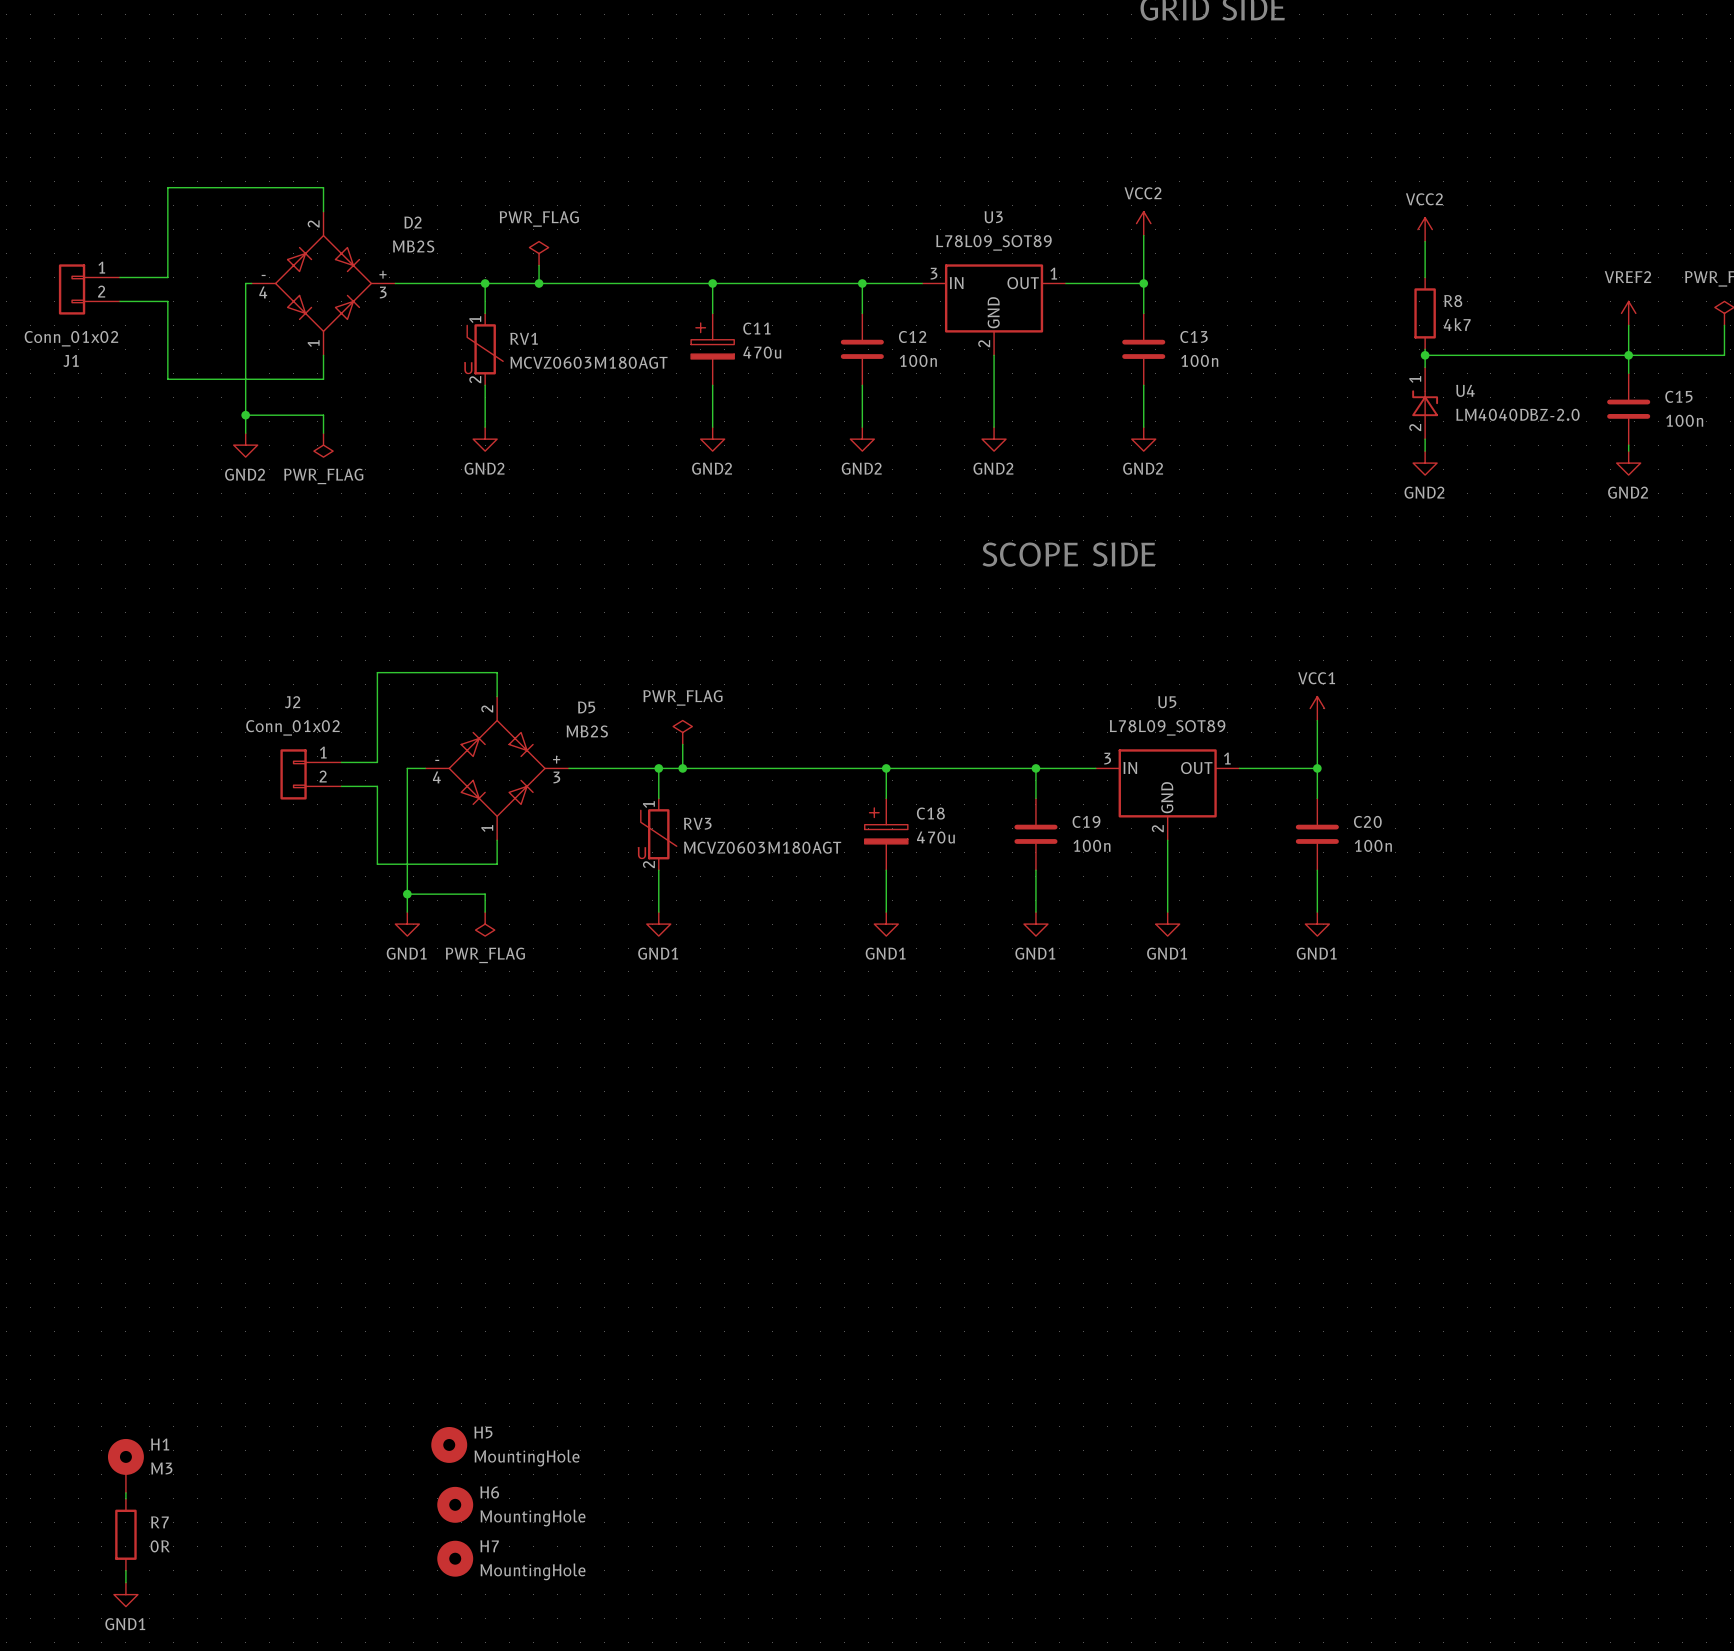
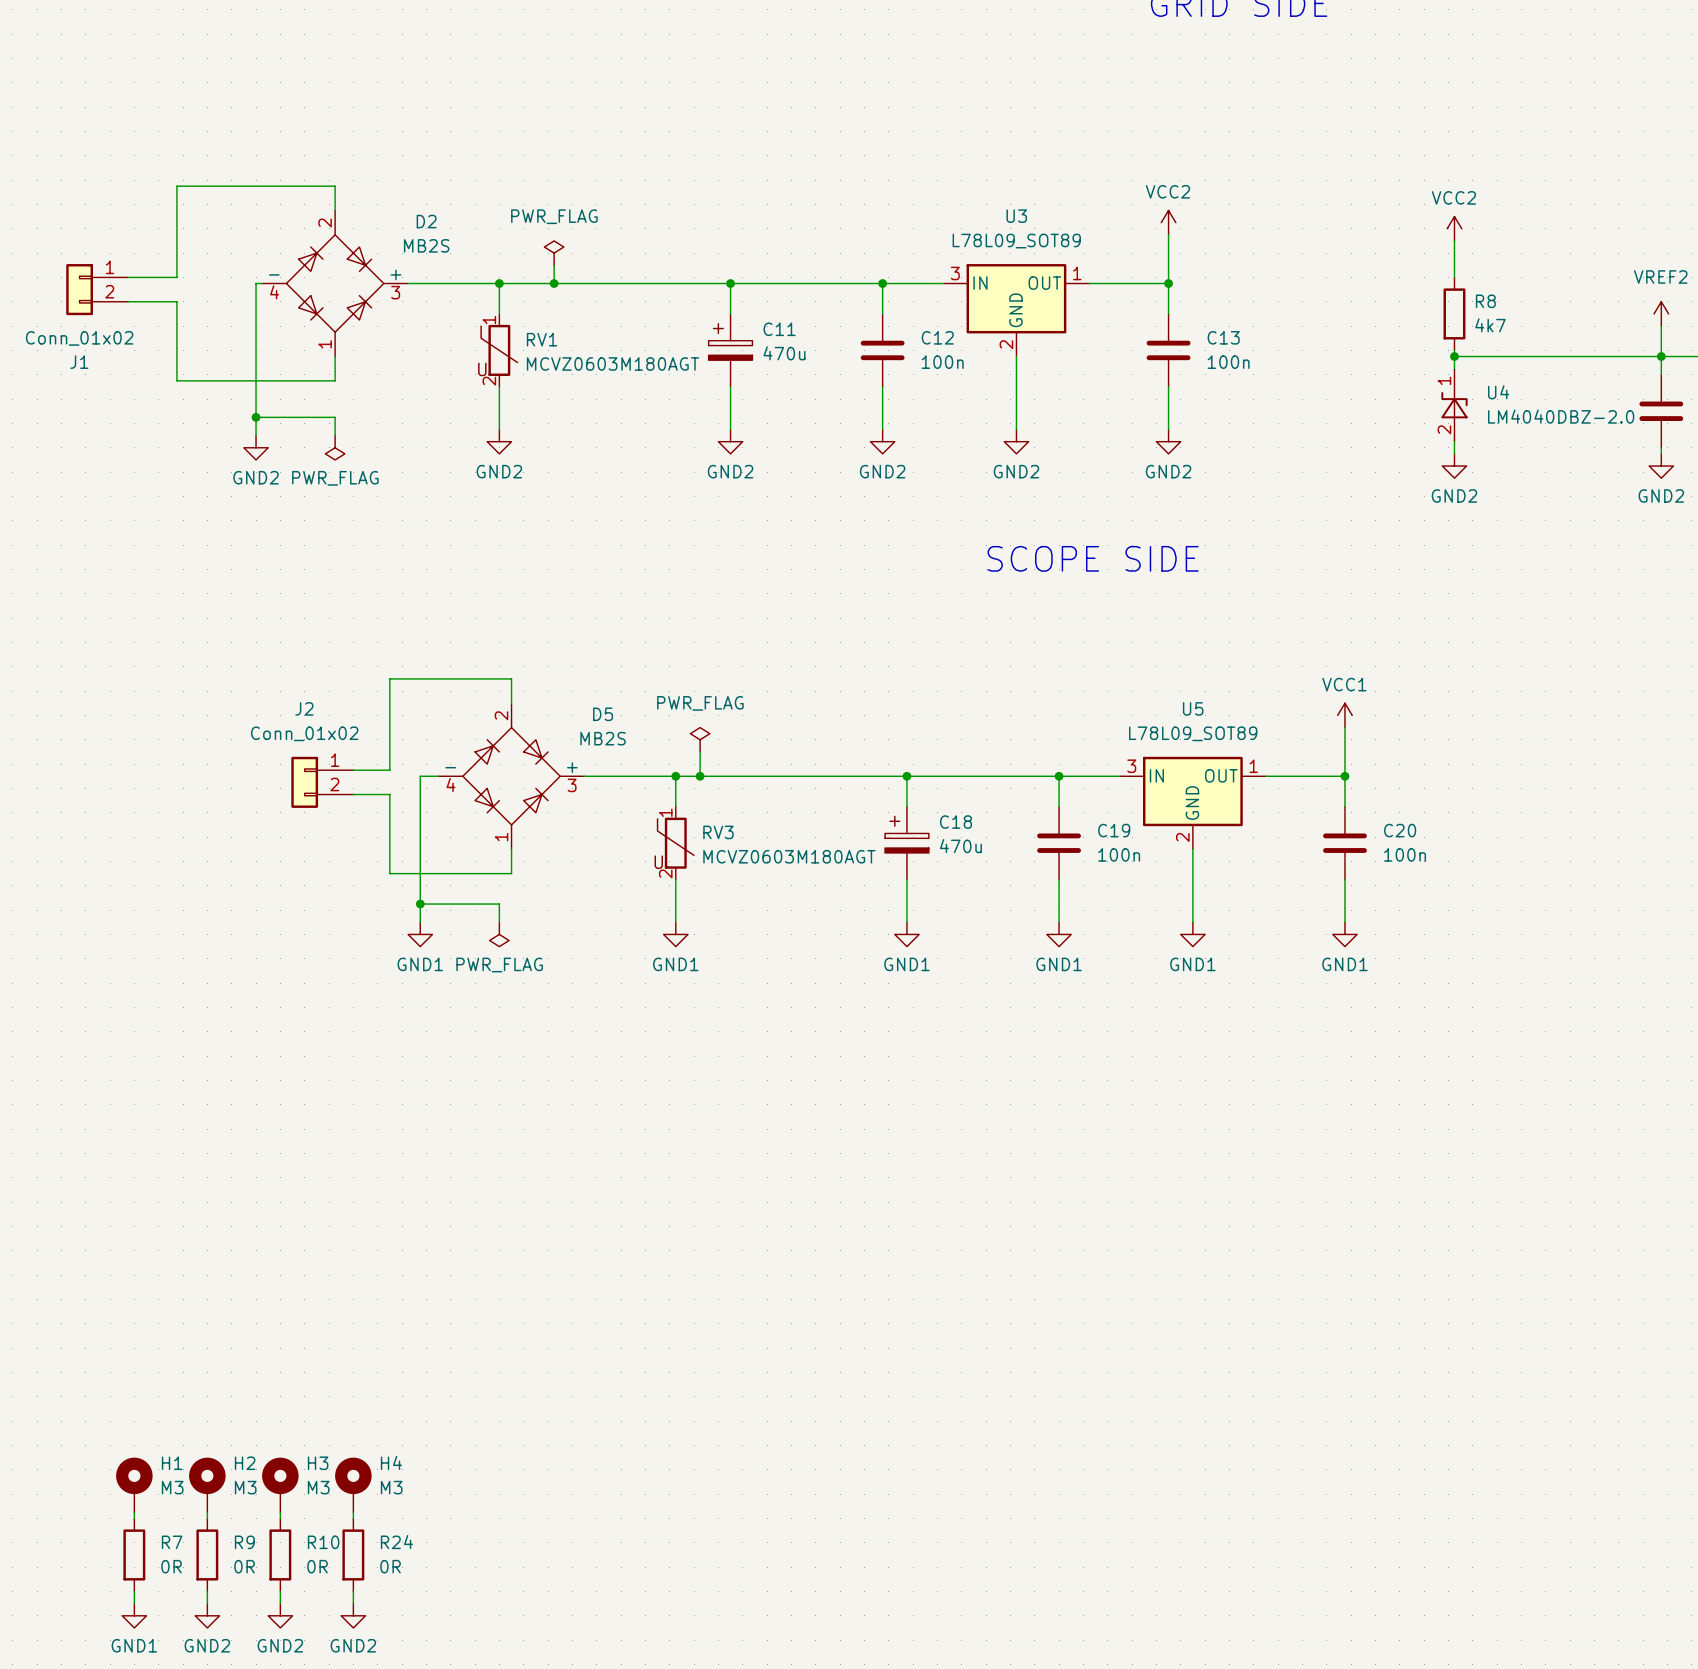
H5: MountingHole (449, 1444) -> none
H2: none -> M3 (207, 1485)
H3: none -> M3 (280, 1485)
H4: none -> M3 (353, 1485)
wire: none -> (207, 1512) (207, 1518)
wire: none -> (280, 1512) (280, 1518)
wire: none -> (353, 1512) (353, 1518)
H6: MountingHole (455, 1504) -> none
R9: none -> 0R (207, 1554)
R10: none -> 0R (280, 1554)
R24: none -> 0R (353, 1554)
H7: MountingHole (455, 1558) -> none
wire: none -> (207, 1591) (207, 1603)
wire: none -> (280, 1591) (280, 1603)
wire: none -> (353, 1591) (353, 1603)
power symbol: none -> GND2 (207, 1615)
power symbol: none -> GND2 (280, 1615)
power symbol: none -> GND2 (353, 1615)

